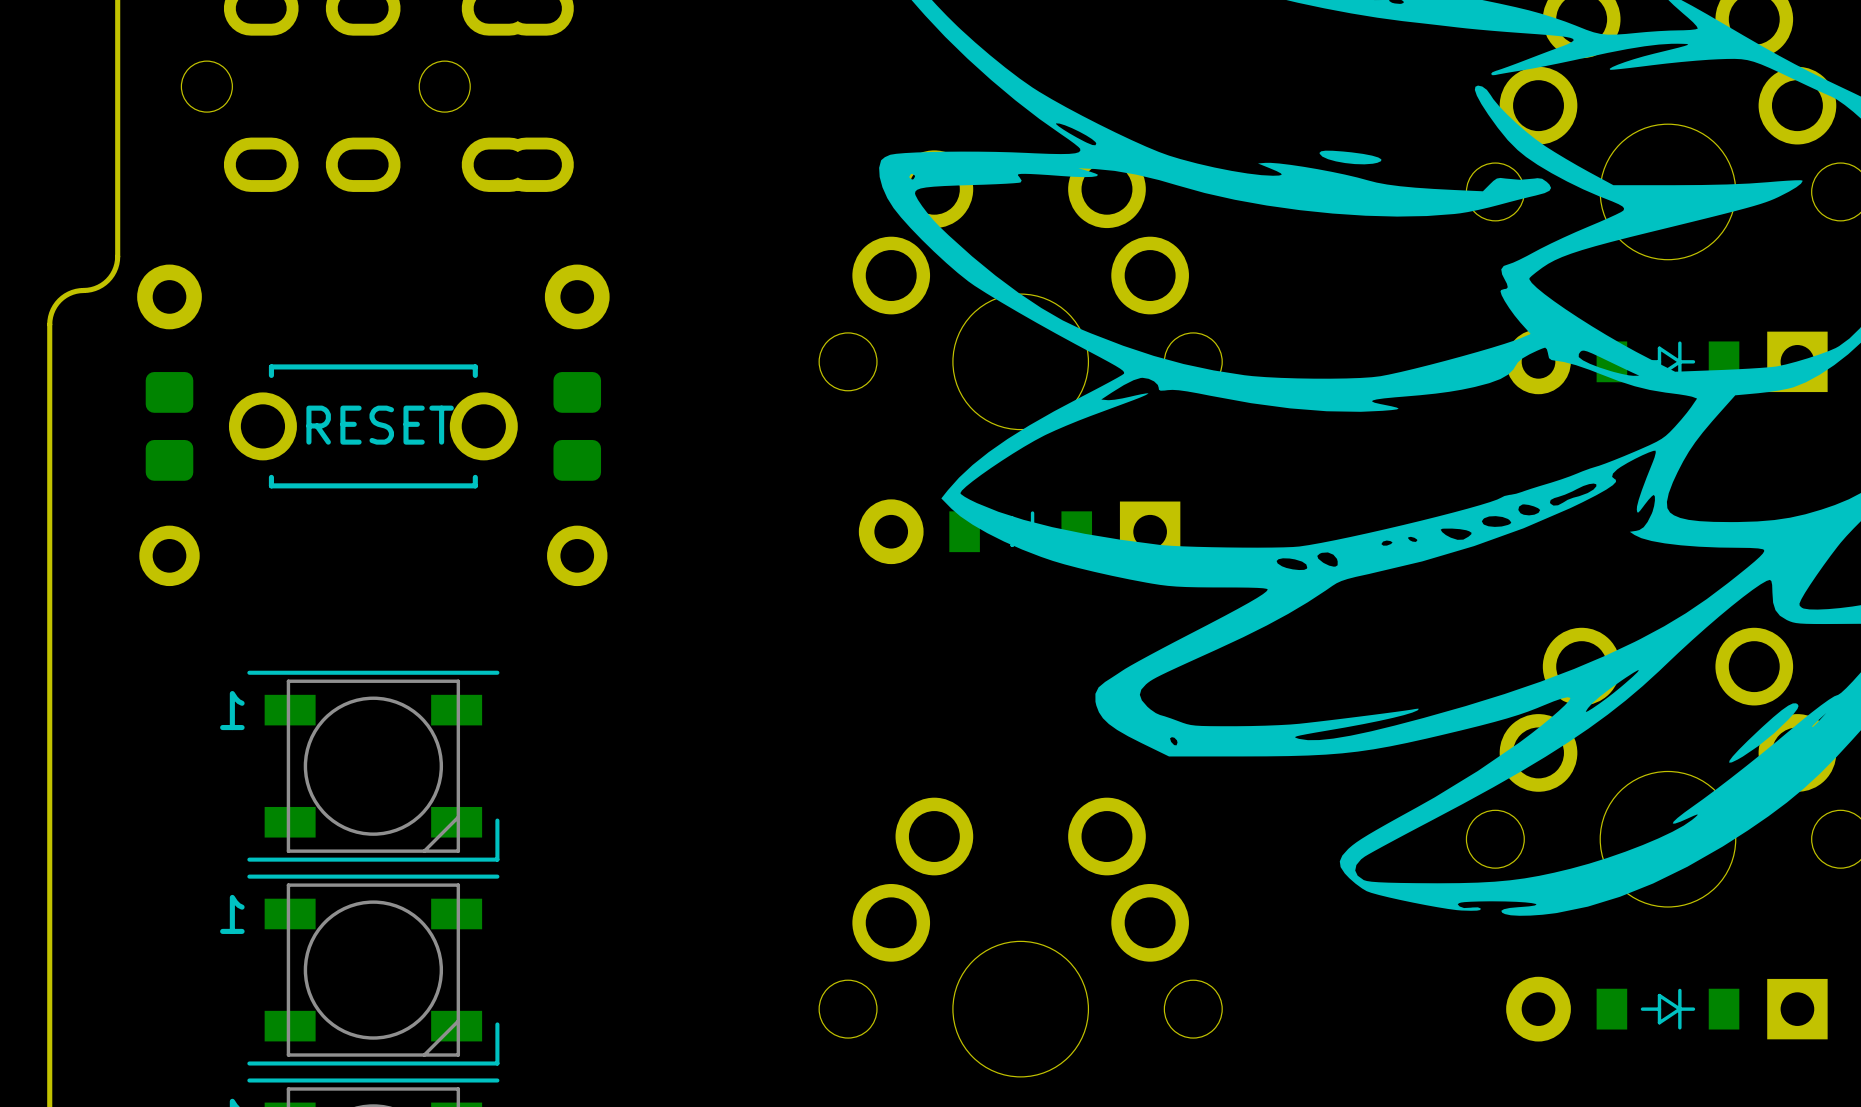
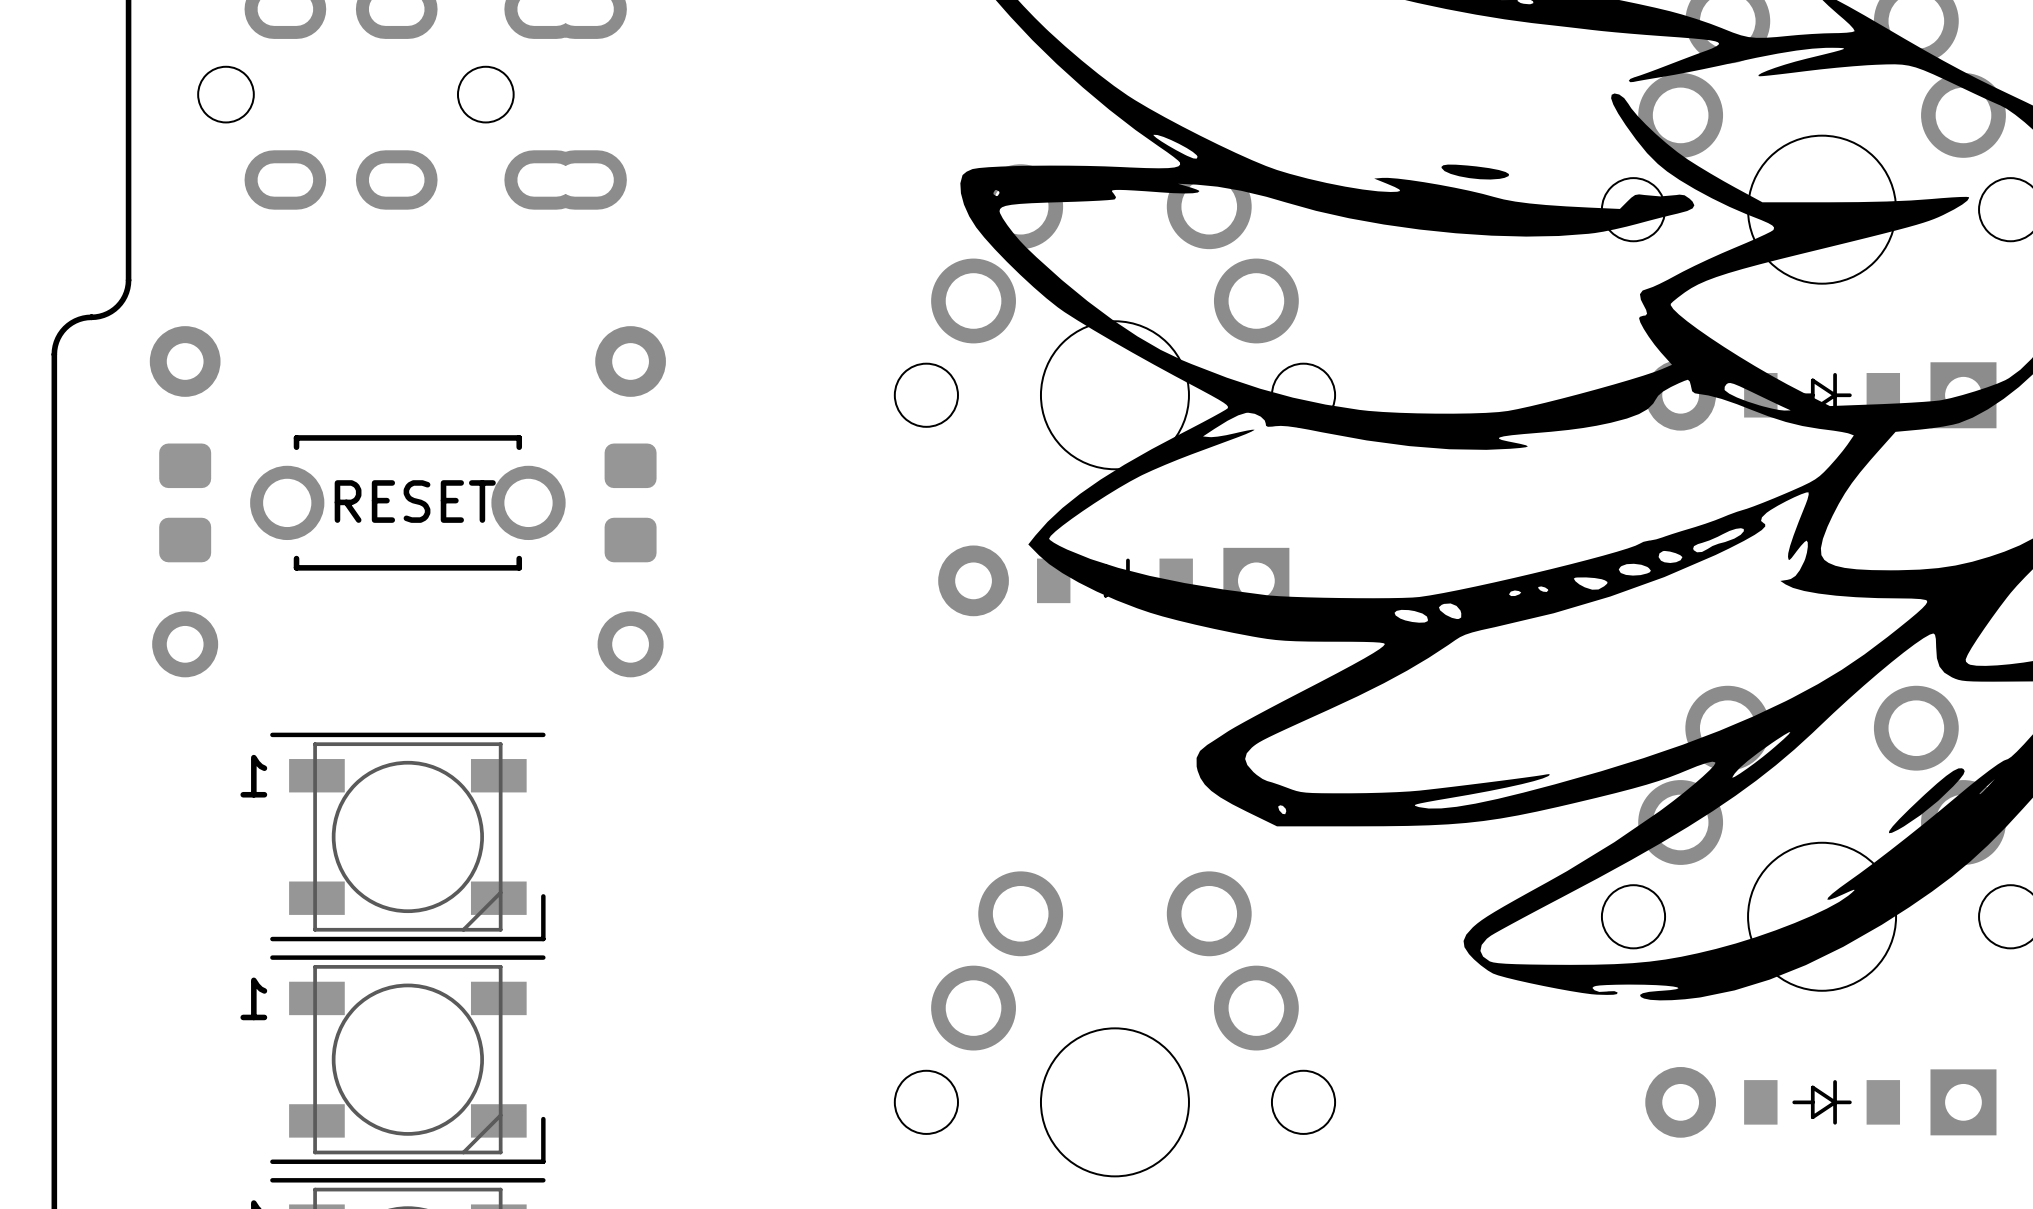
part position: (169, 425) -> (185, 501)
part position: (577, 425) -> (630, 501)
part position: (373, 426) -> (407, 502)

